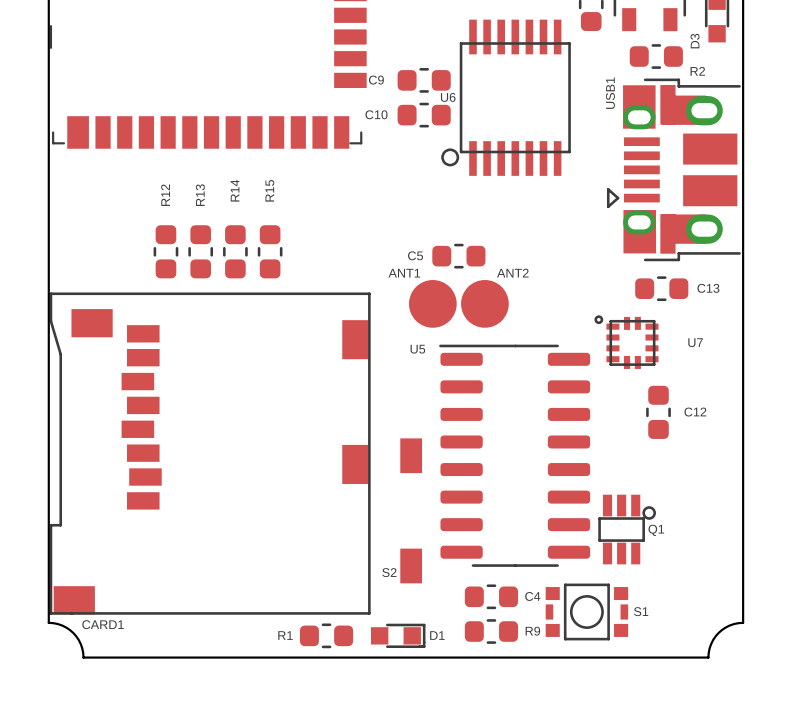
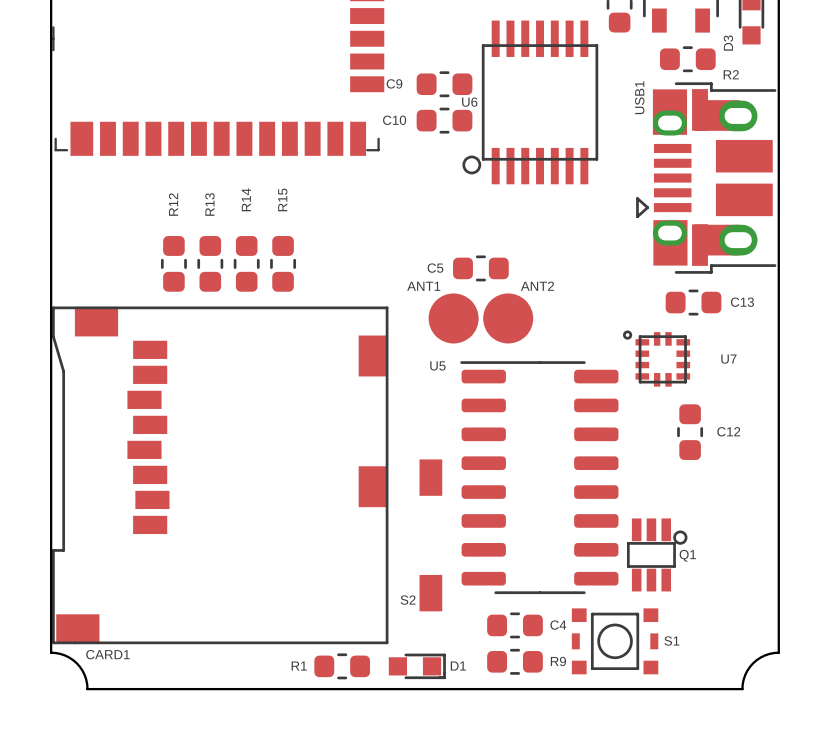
CARD1 footprint: [49, 292, 371, 615] -> [52, 306, 389, 645]
S1 footprint: [545, 583, 629, 641] -> [571, 608, 659, 675]

